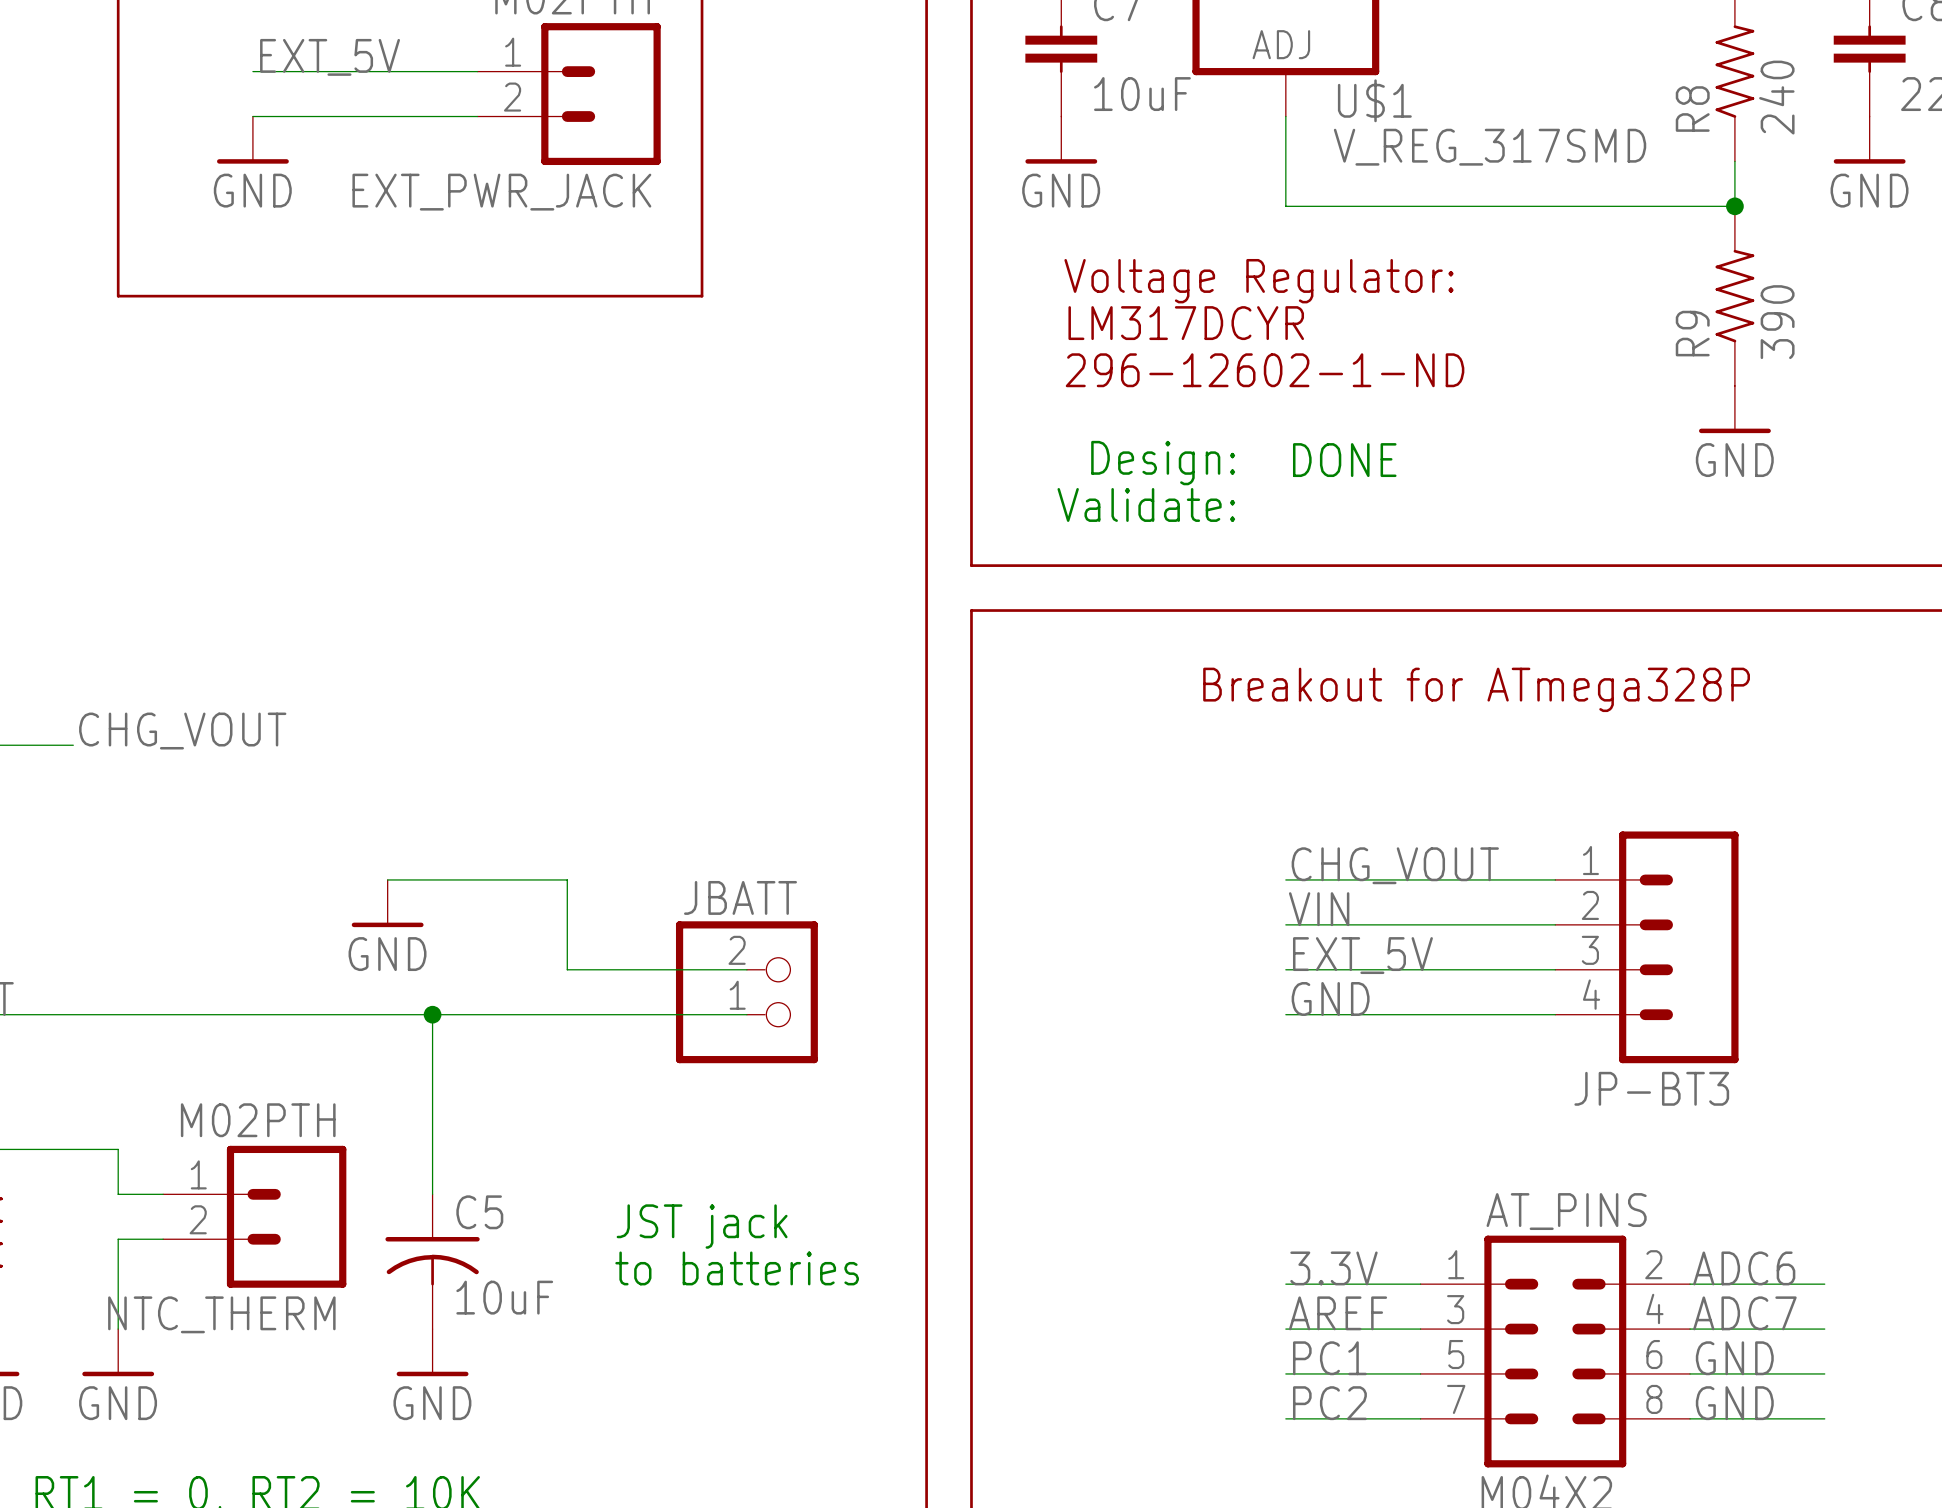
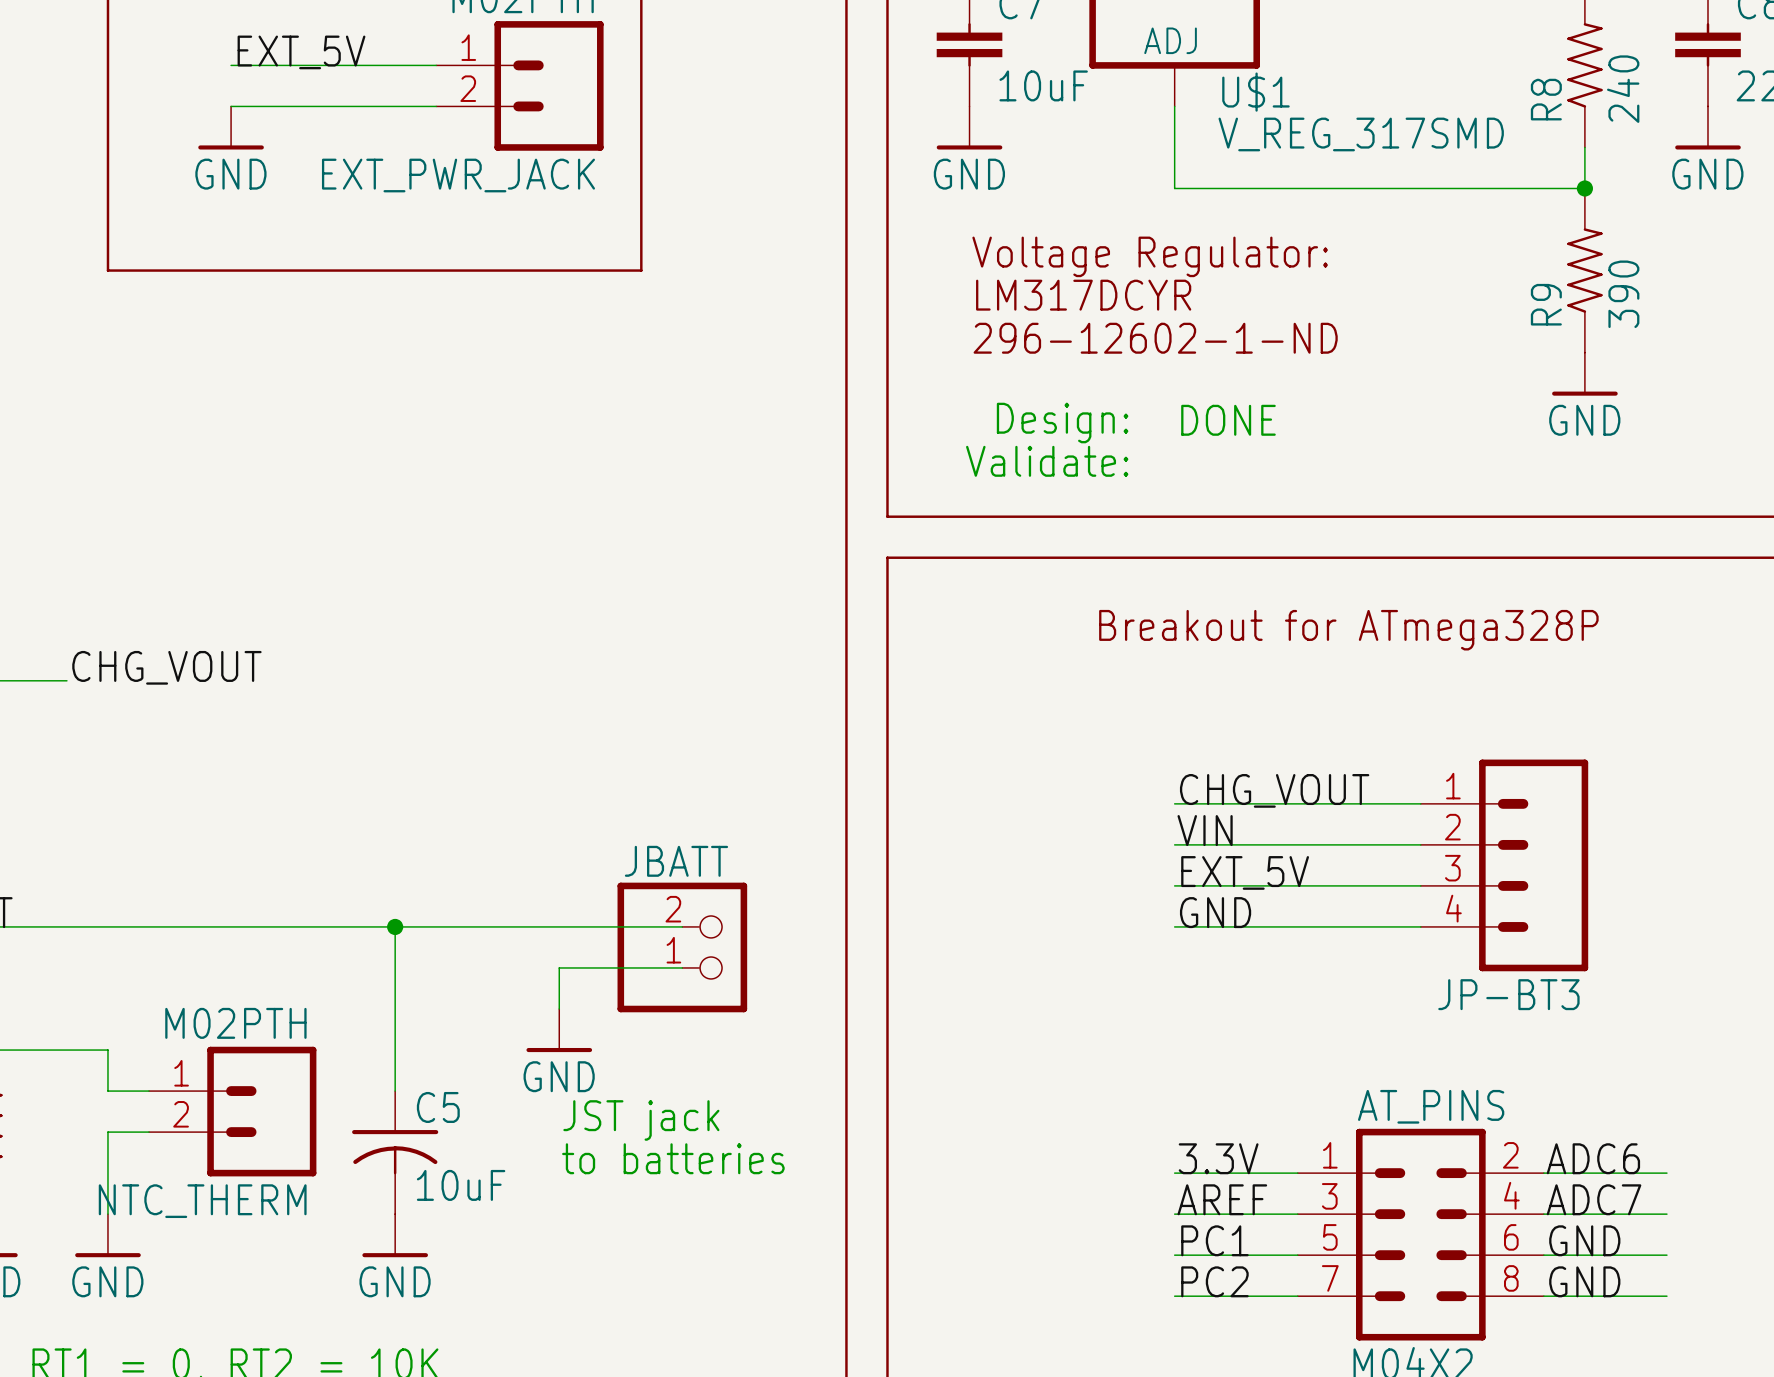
wire: (387, 879) (567, 879) (567, 969) (746, 969) -> none
power symbol position: GND (387, 903) -> GND (559, 1030)
JBATT position: (746, 992) -> (682, 947)
wire: none -> (682, 967) (559, 967) (559, 1009)

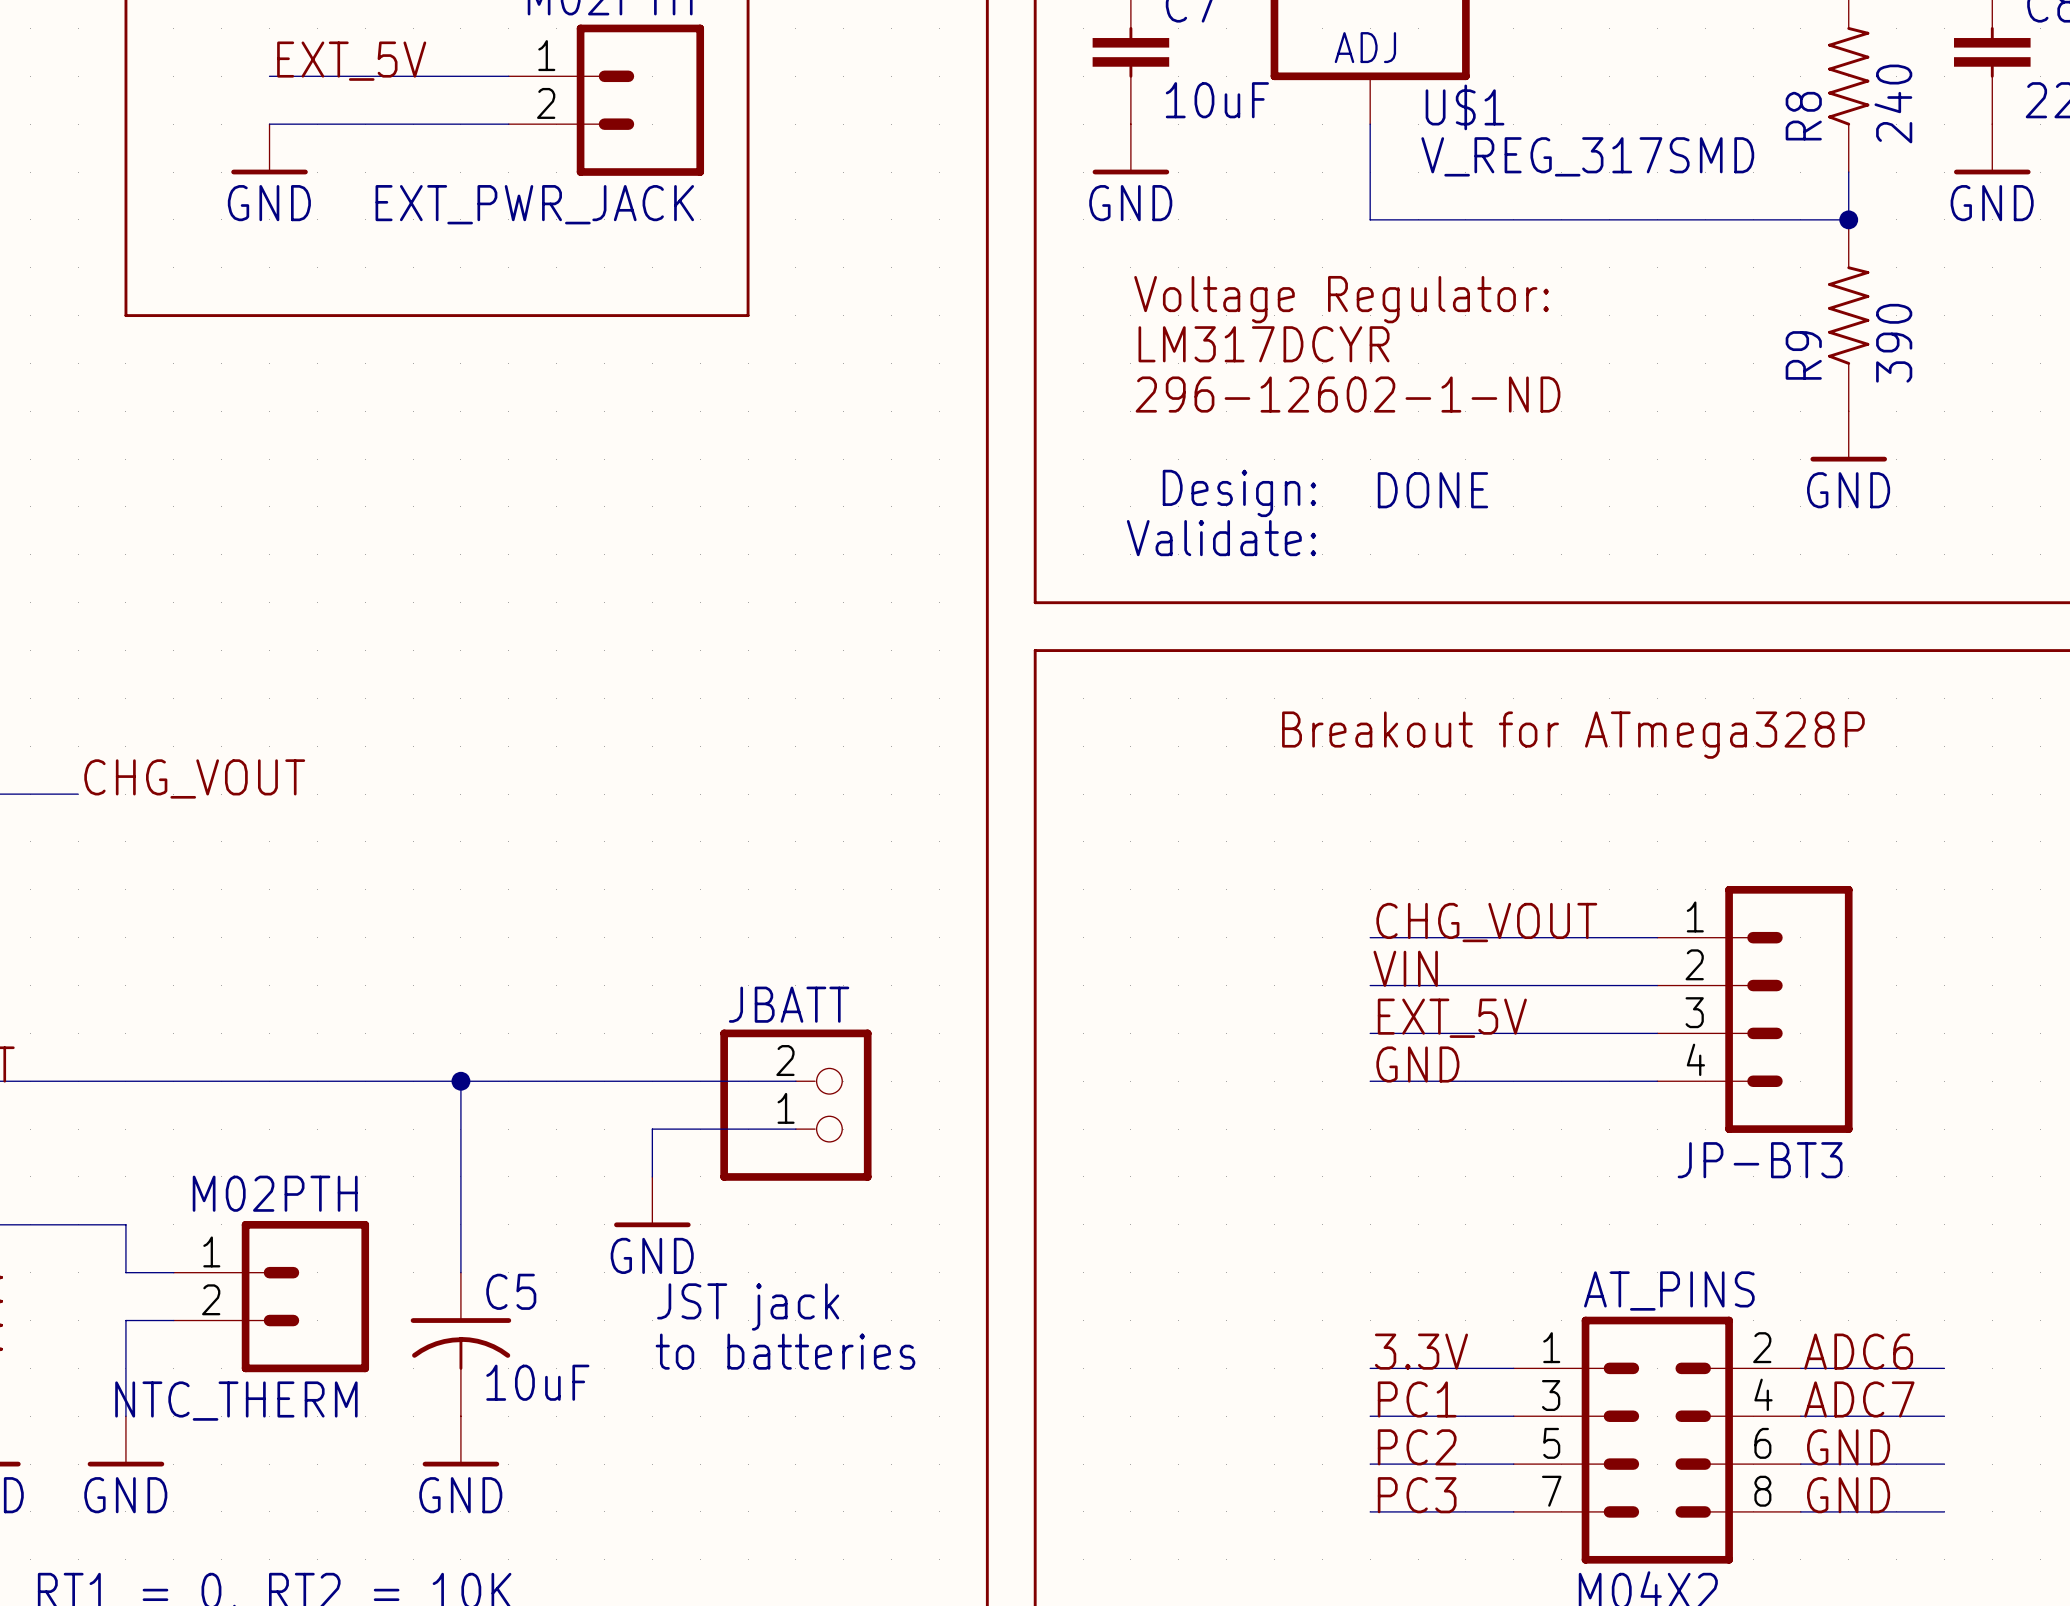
label: AREF (1222, 1199) -> PC1 (1417, 1399)
label: PC1 (1214, 1240) -> PC2 (1417, 1447)
label: PC2 (1214, 1281) -> PC3 (1417, 1495)

